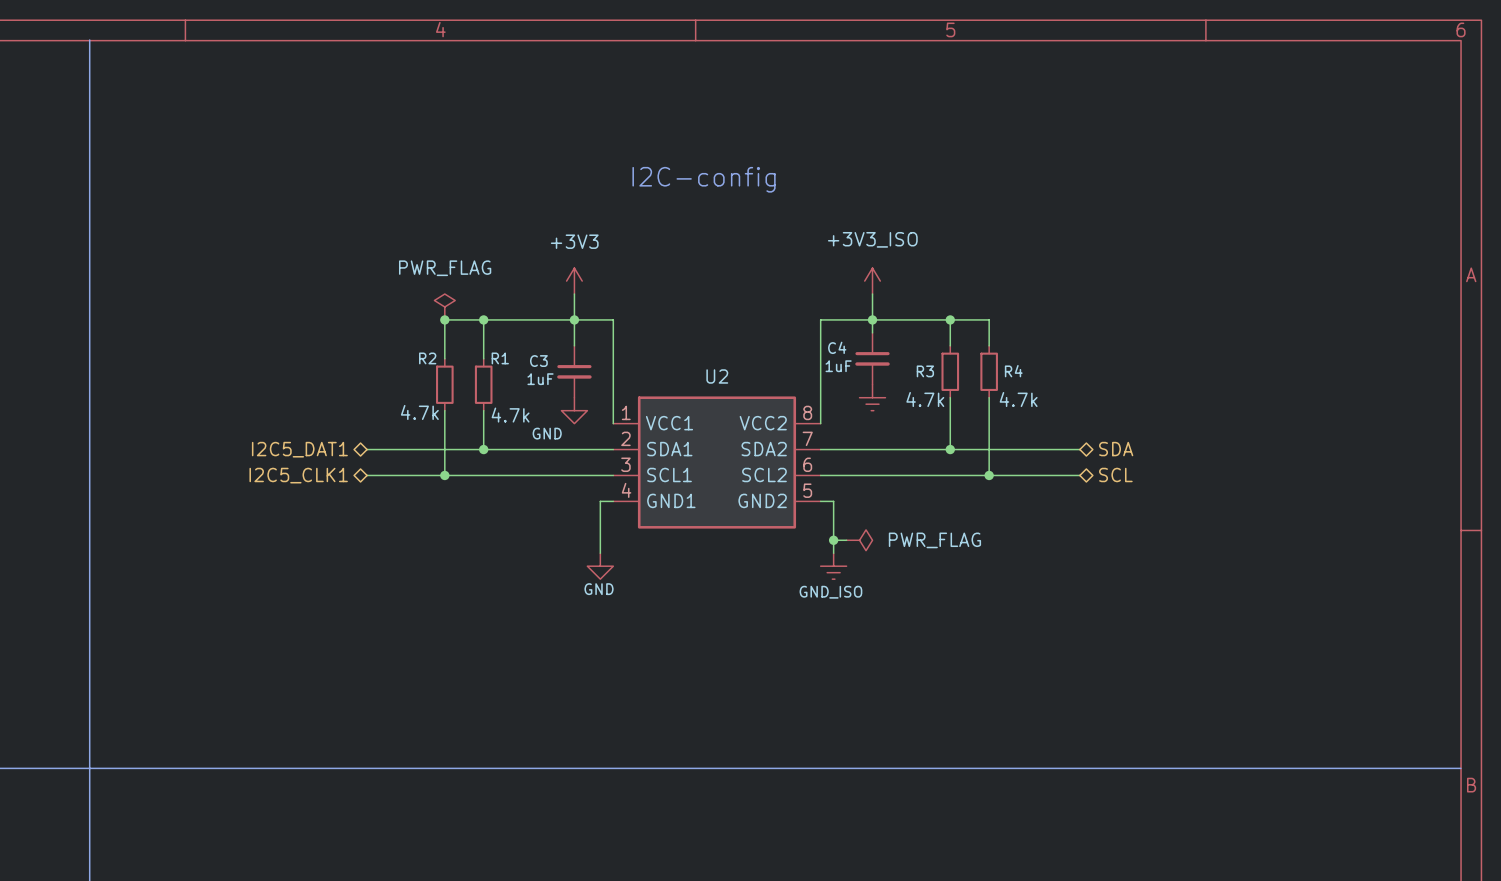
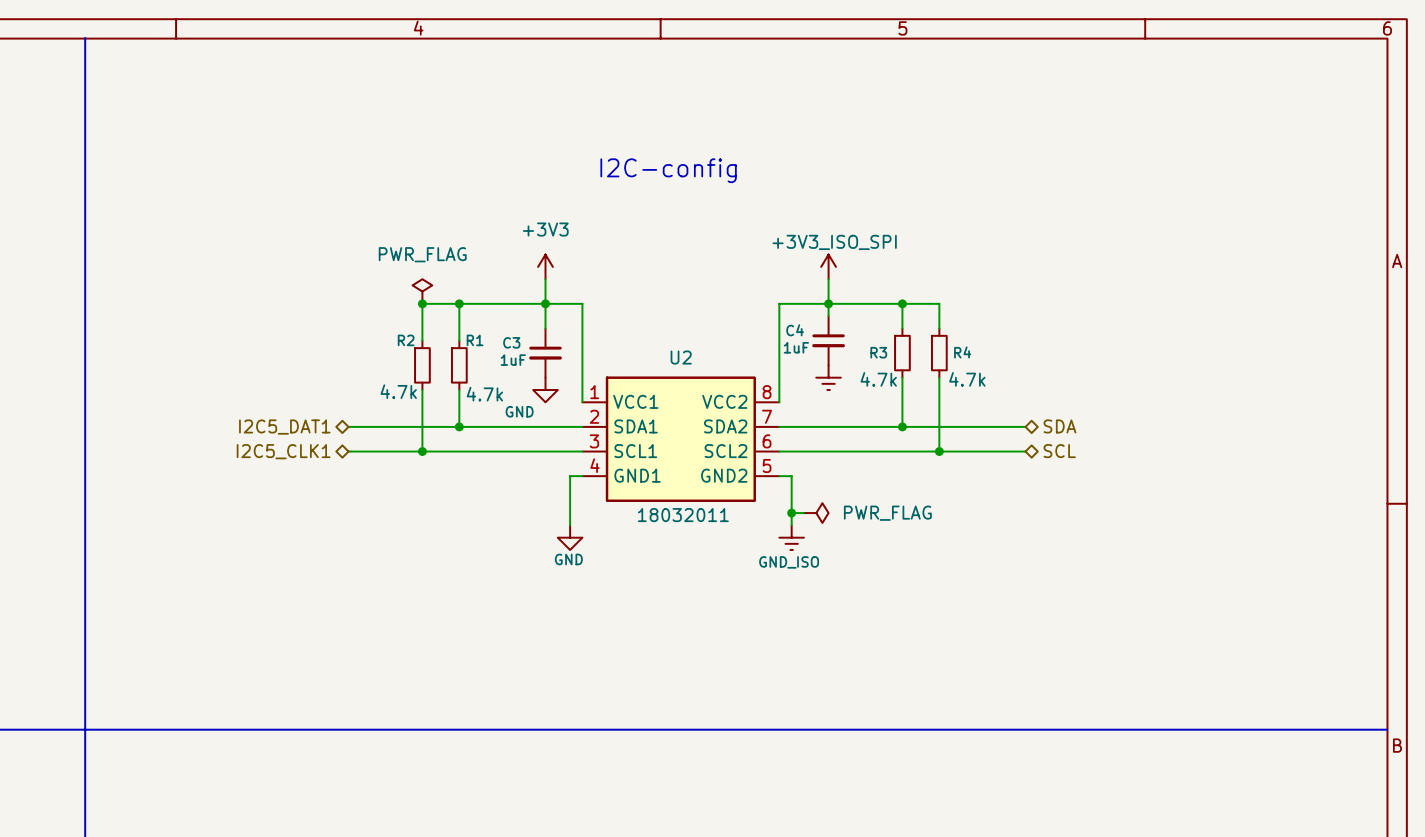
power symbol: +3V3_ISO (872, 281) -> +3V3_ISO_SPI (828, 266)
U2 value: none -> 18032011 (683, 515)

